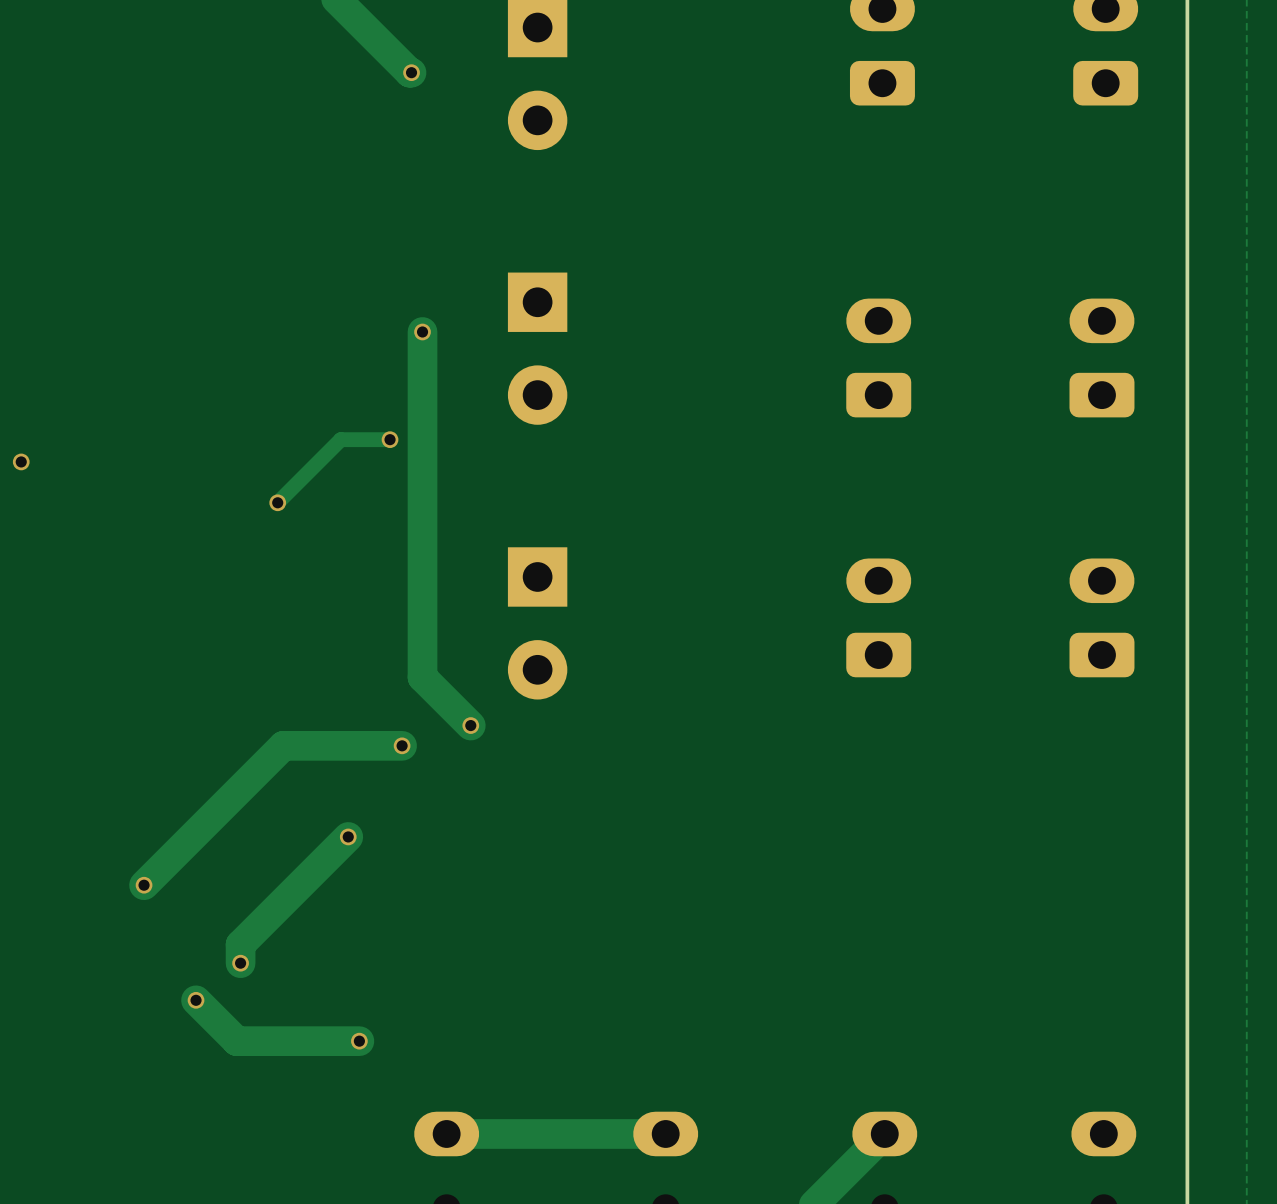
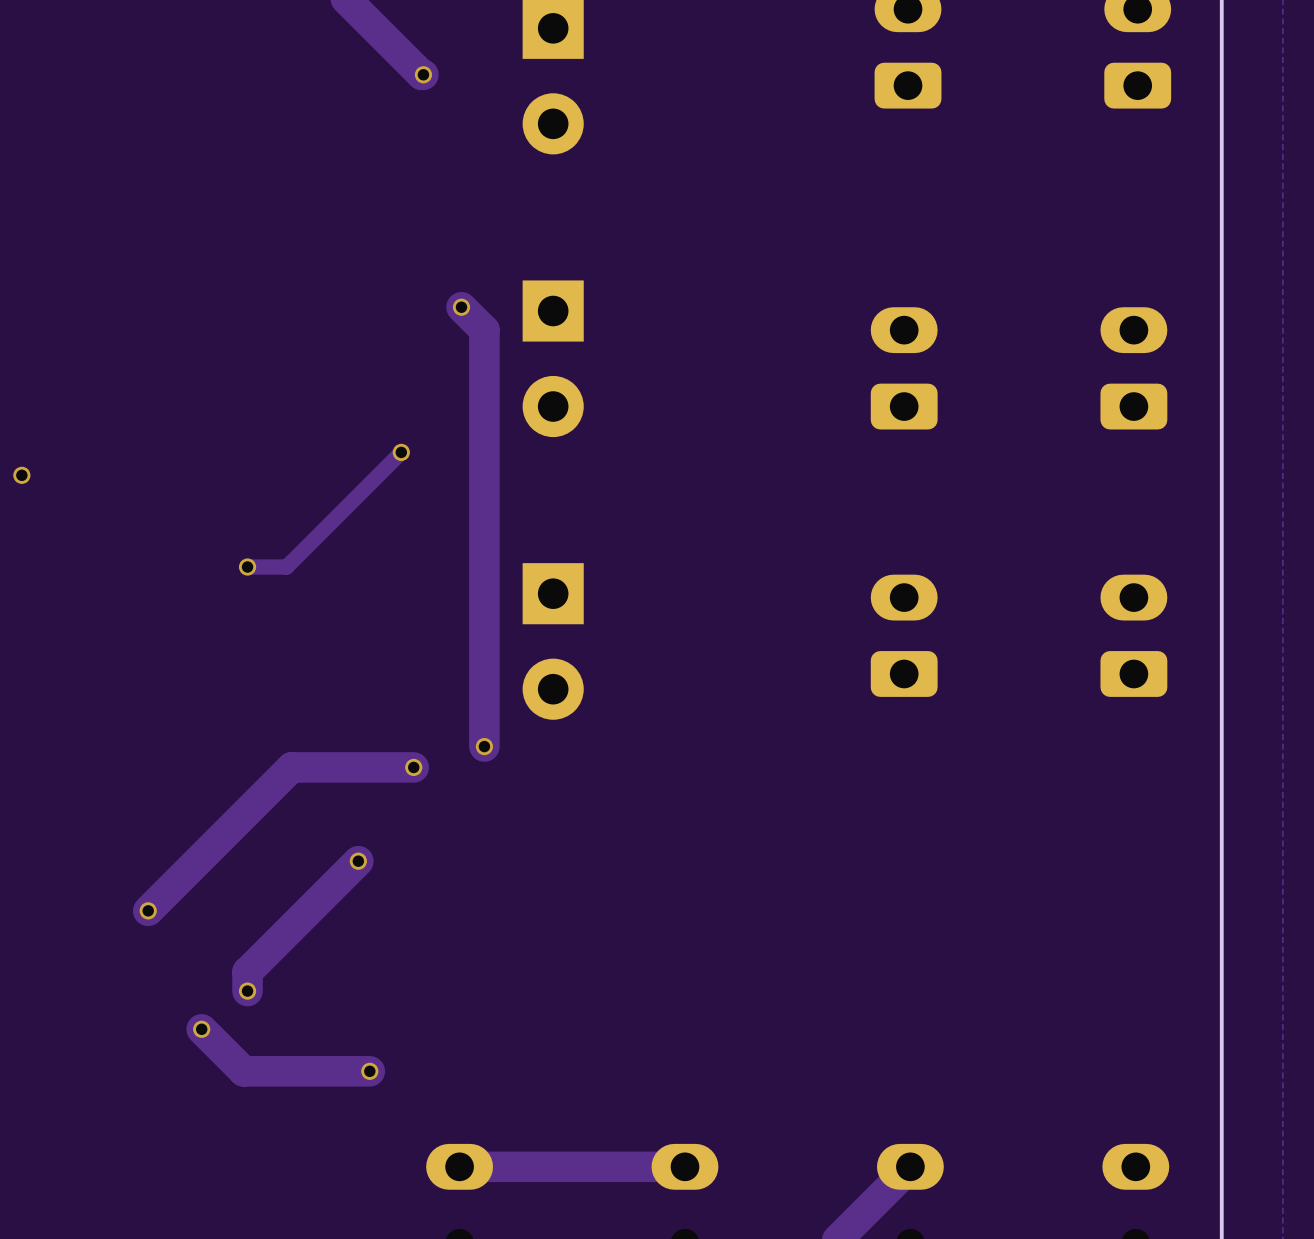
track: (422, 331) (422, 677) (470, 725) -> (461, 307) (484, 330) (484, 746)
via position: (422, 331) -> (461, 307)
track: (390, 439) (340, 439) (277, 502) -> (401, 452) (286, 567) (247, 567)
via position: (277, 502) -> (247, 567)

